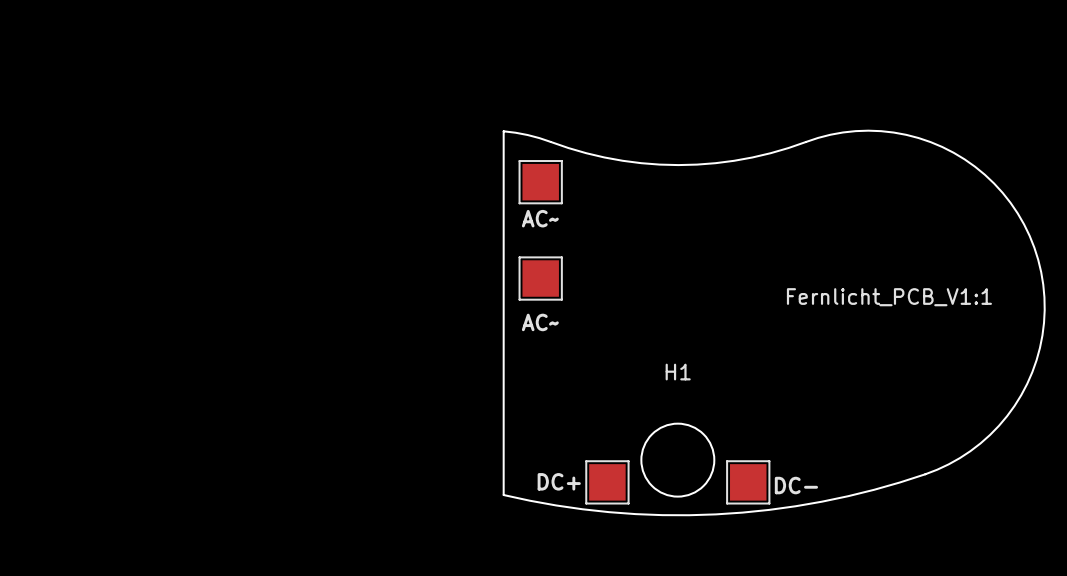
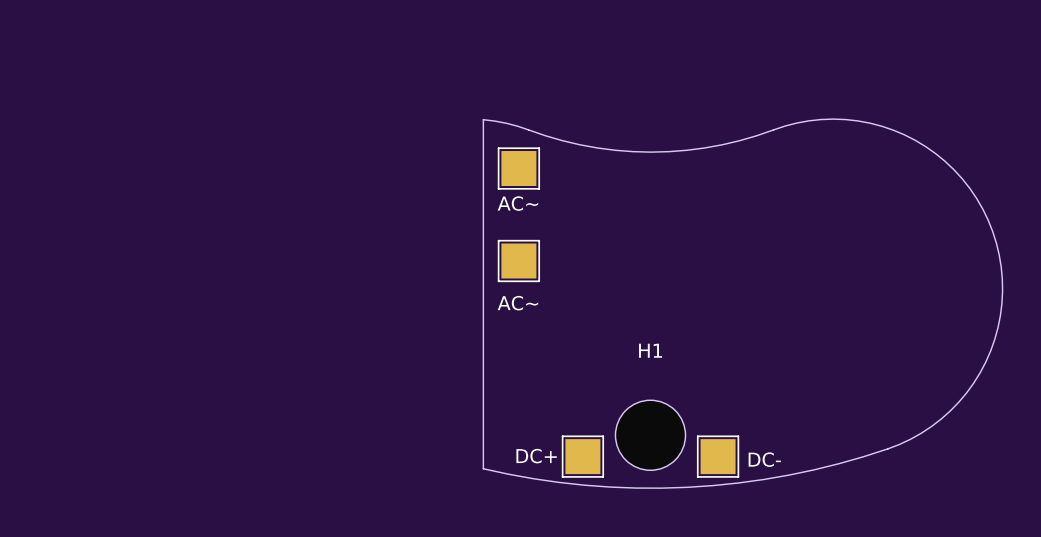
text: Fernlicht_PCB_V1:1 (889, 297) -> none

